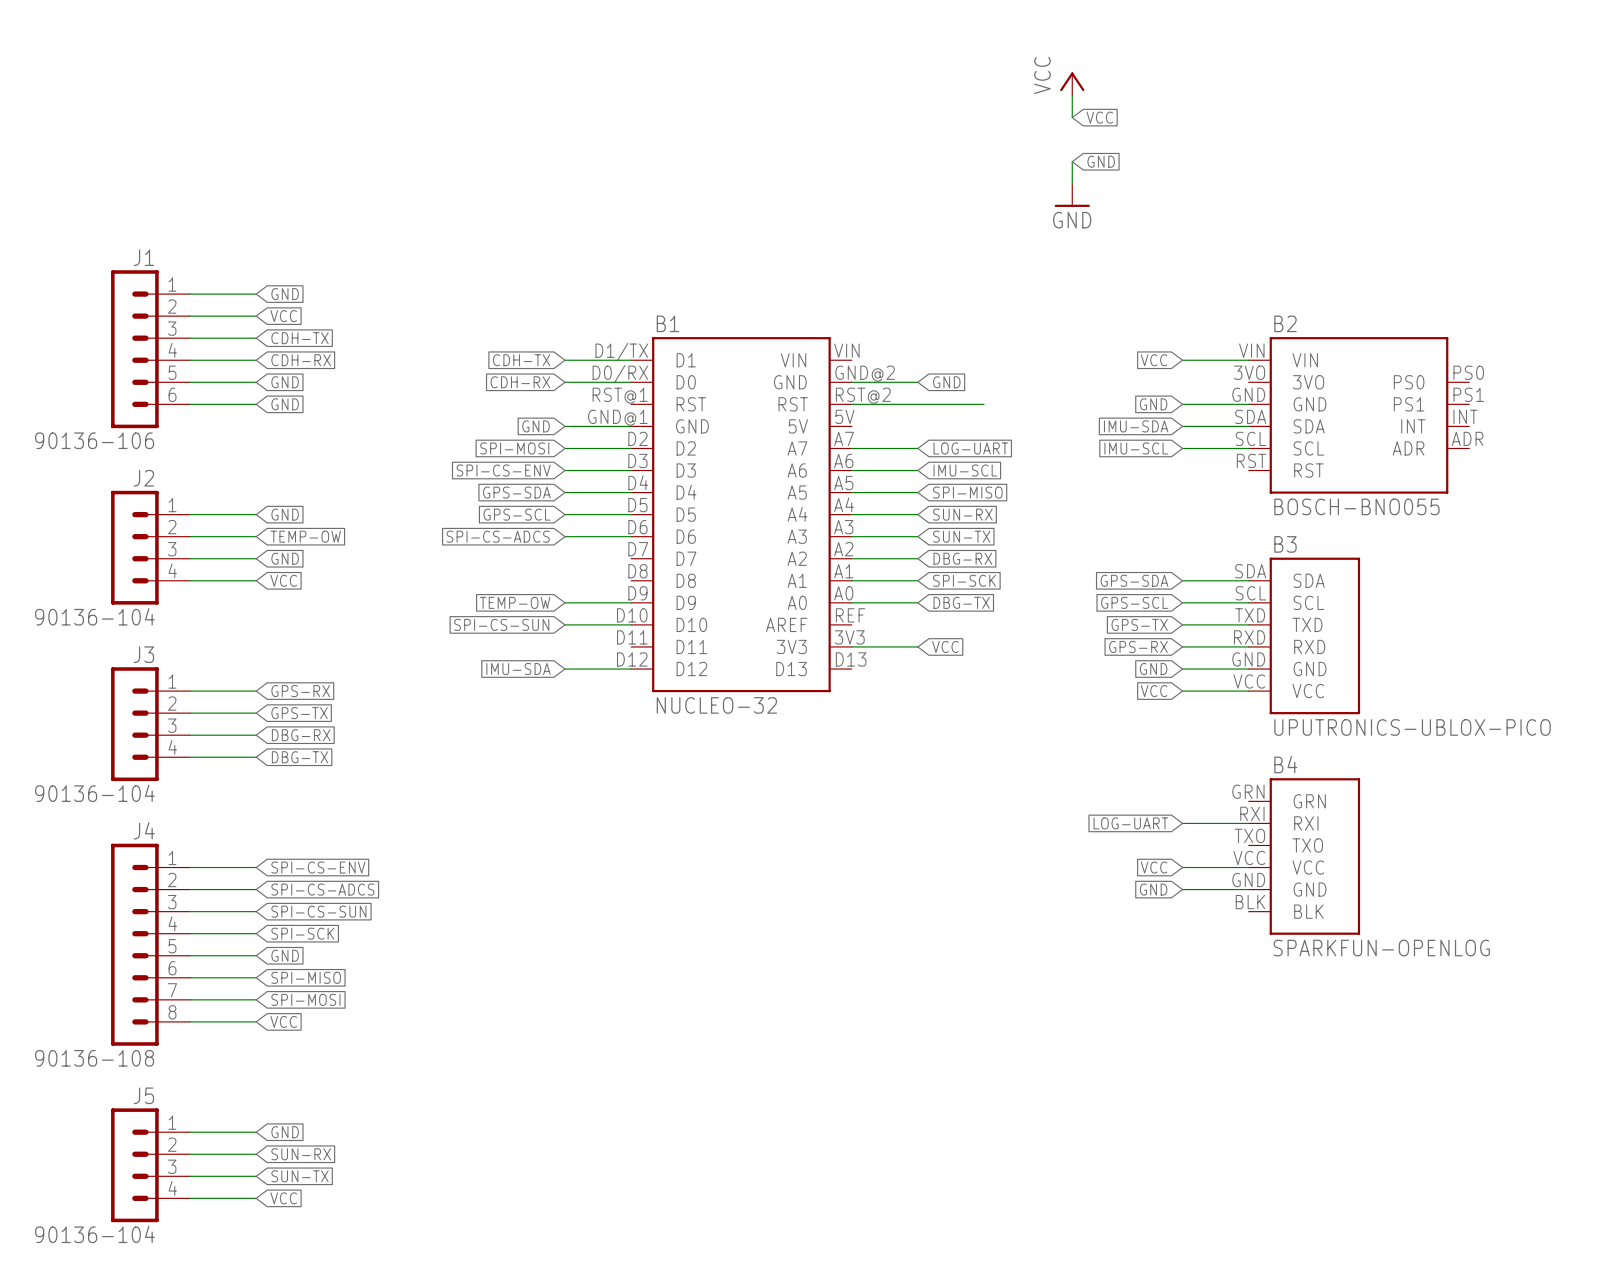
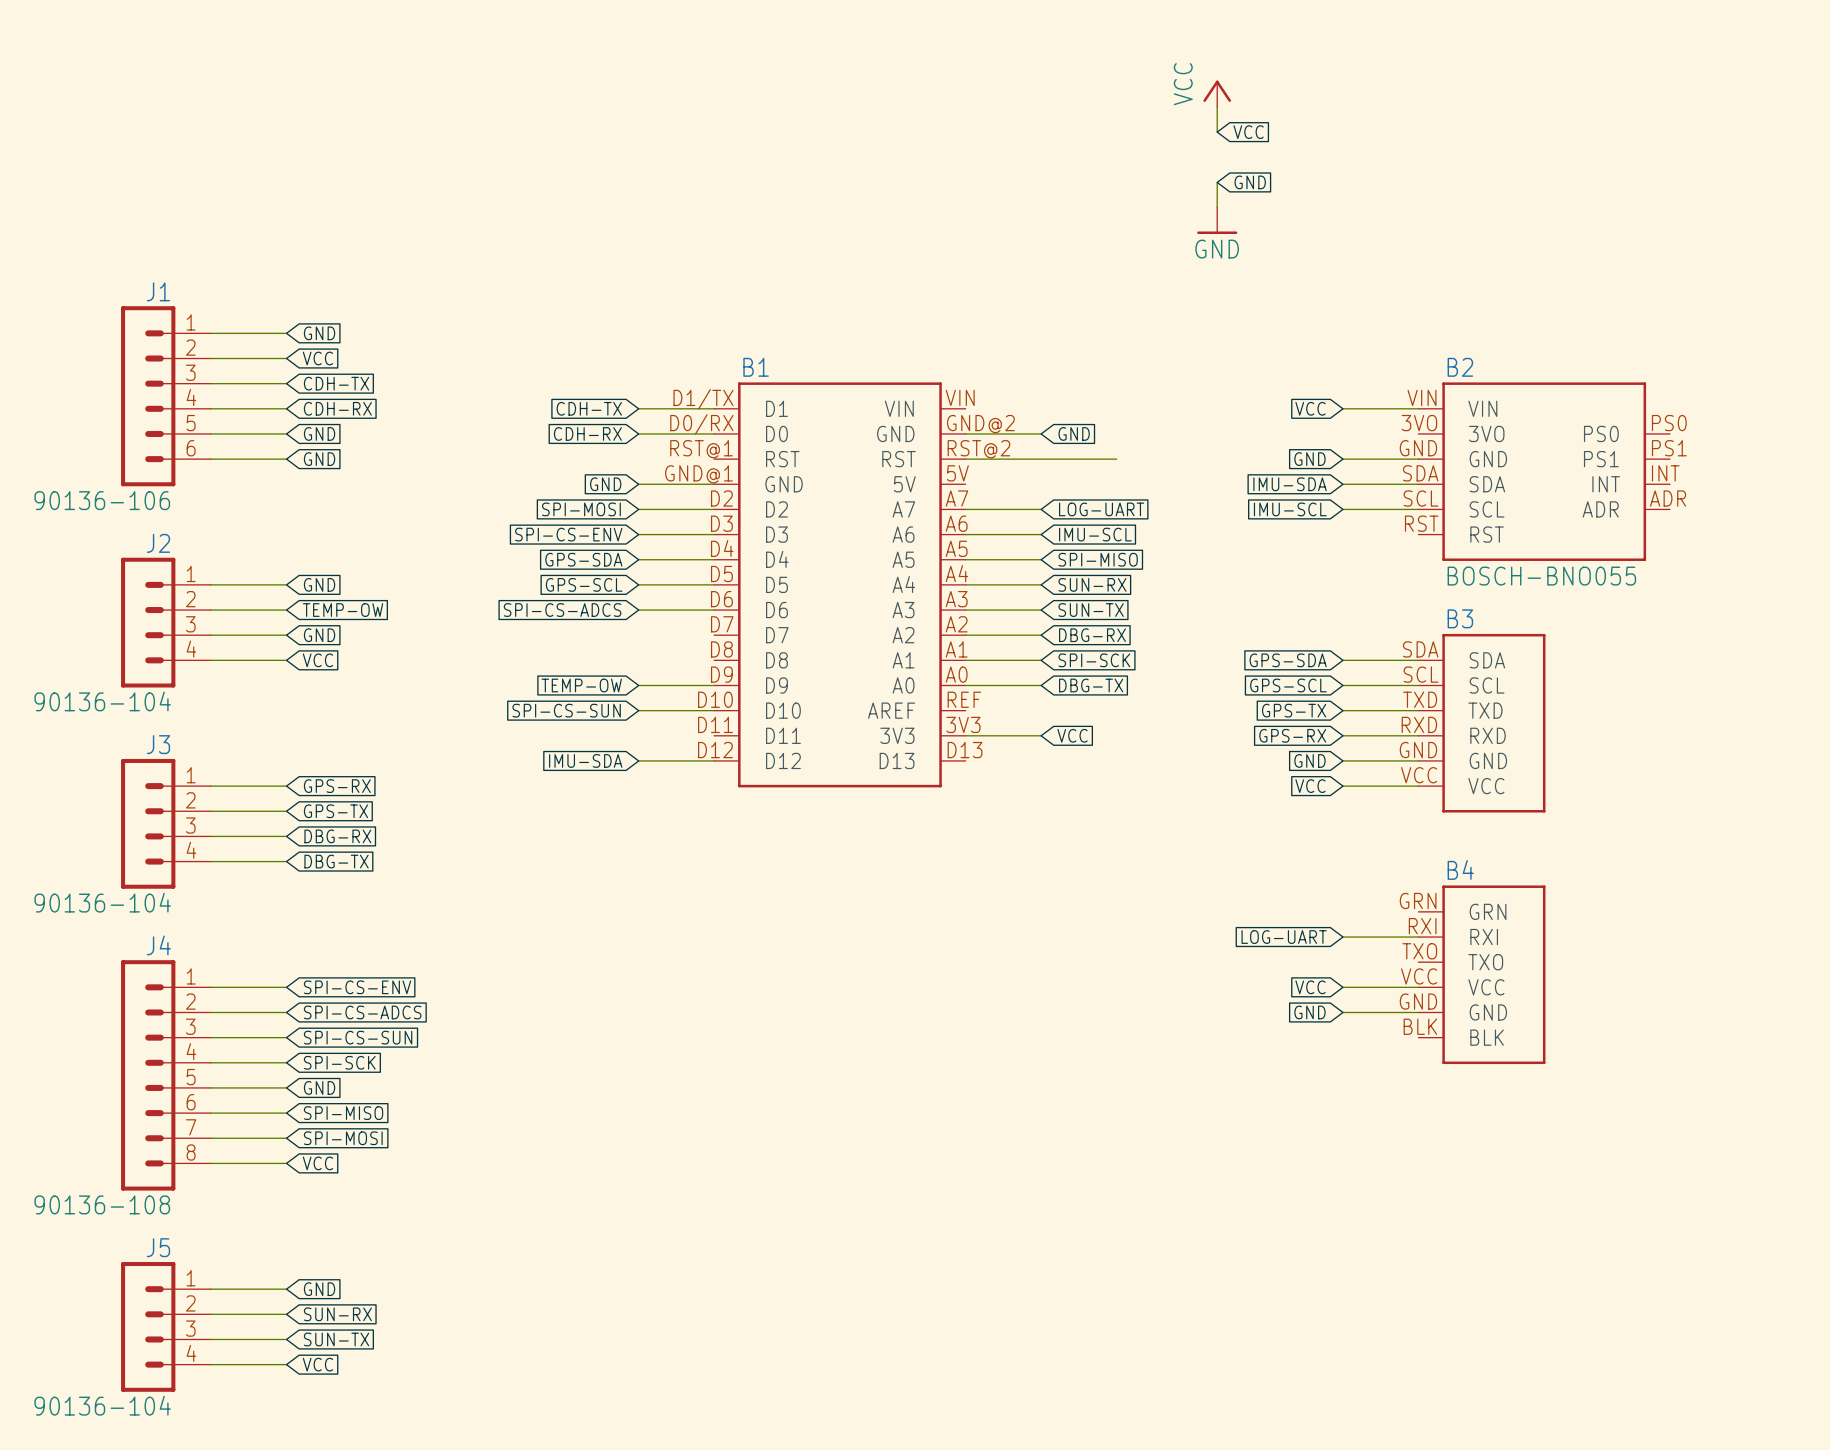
B1 value: NUCLEO-32 (716, 705) -> none
B3 value: UPUTRONICS-UBLOX-PICO (1412, 727) -> none
B4 value: SPARKFUN-OPENLOG (1381, 948) -> none

